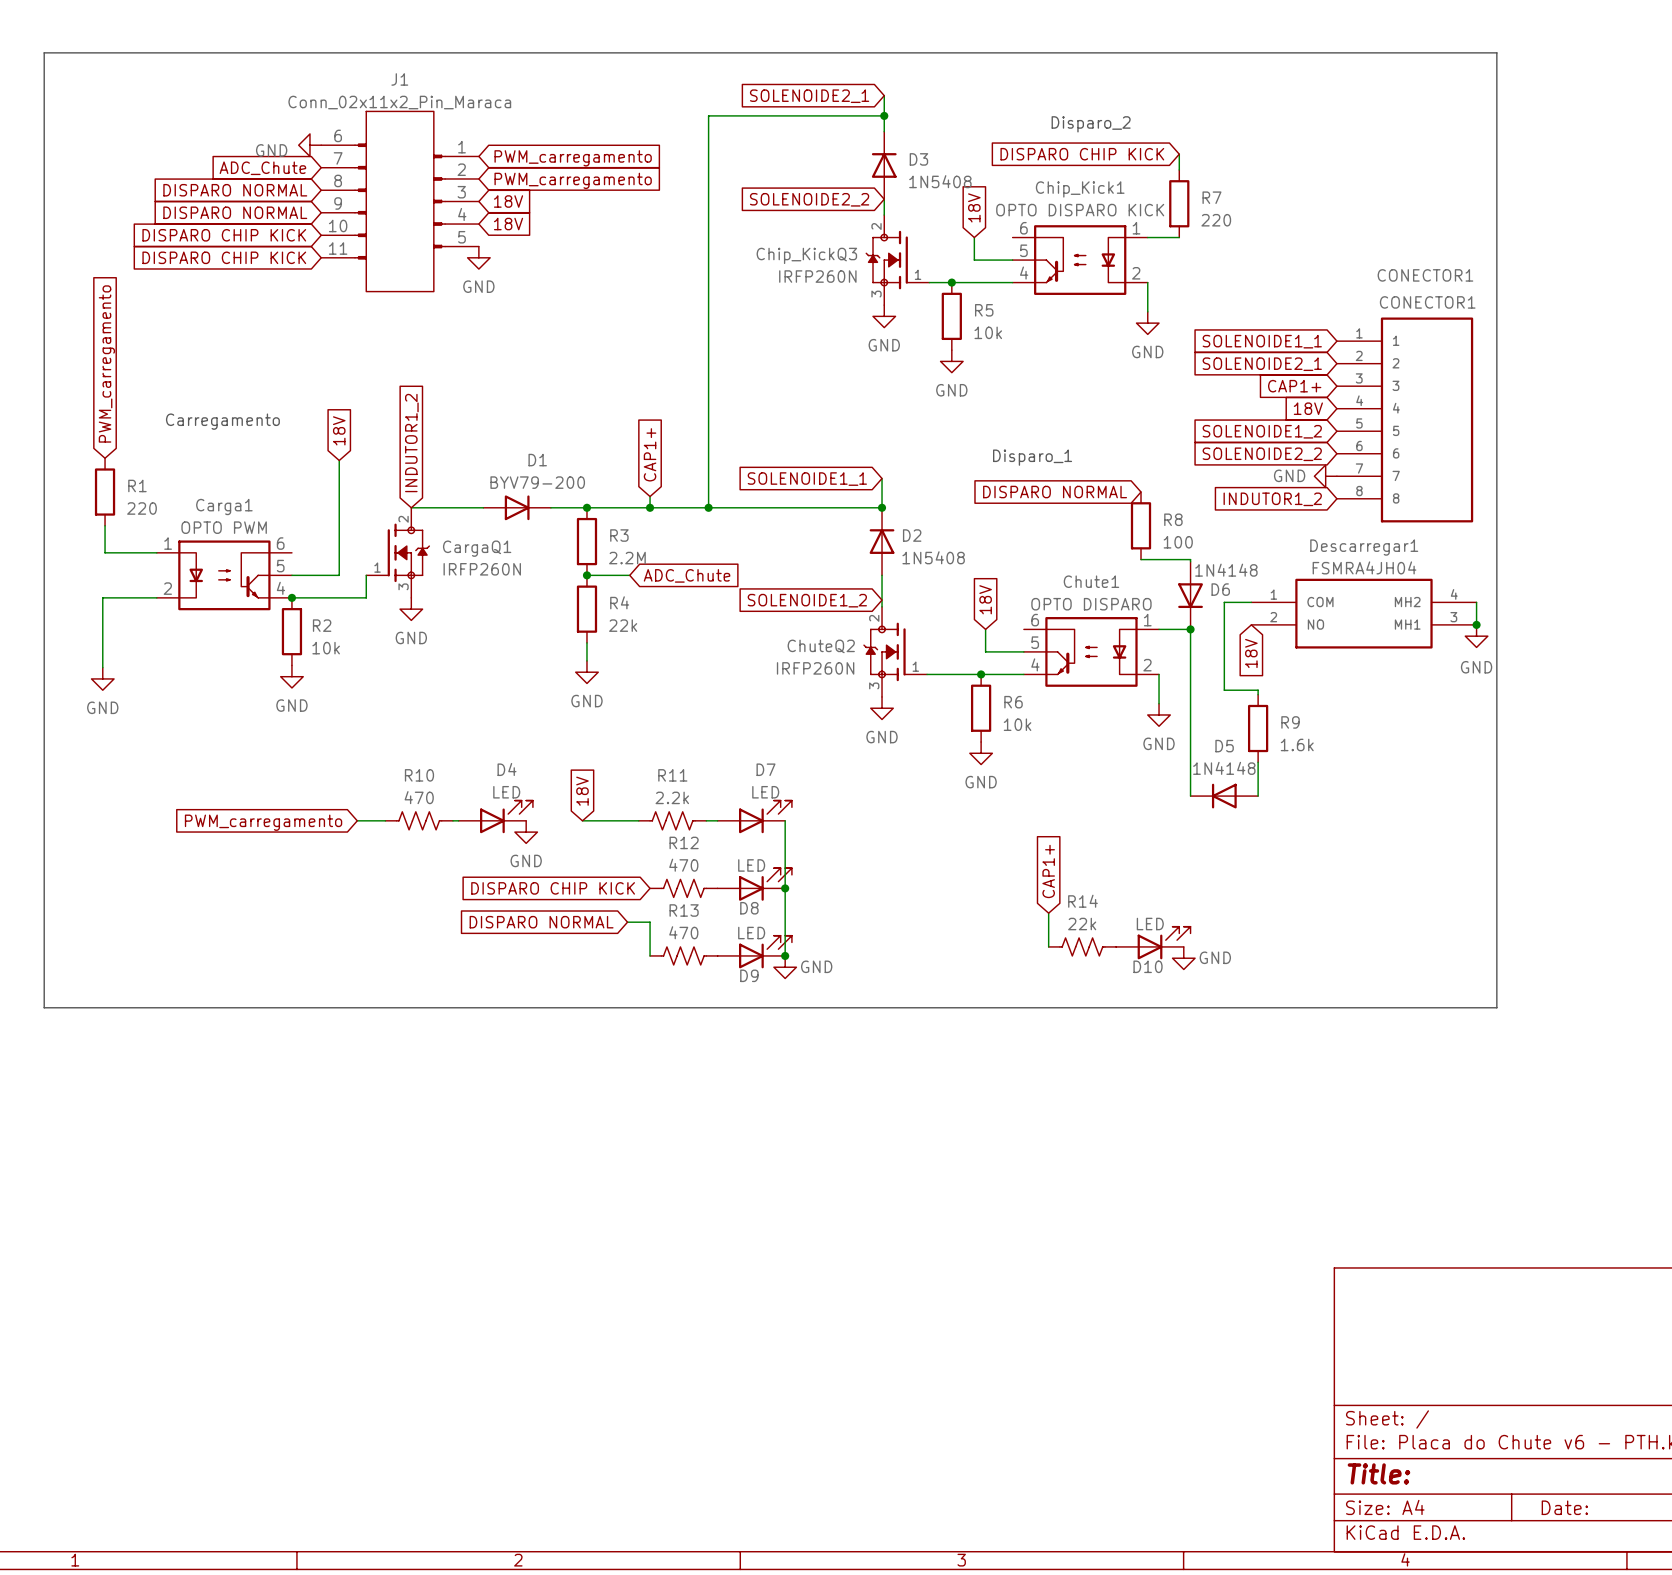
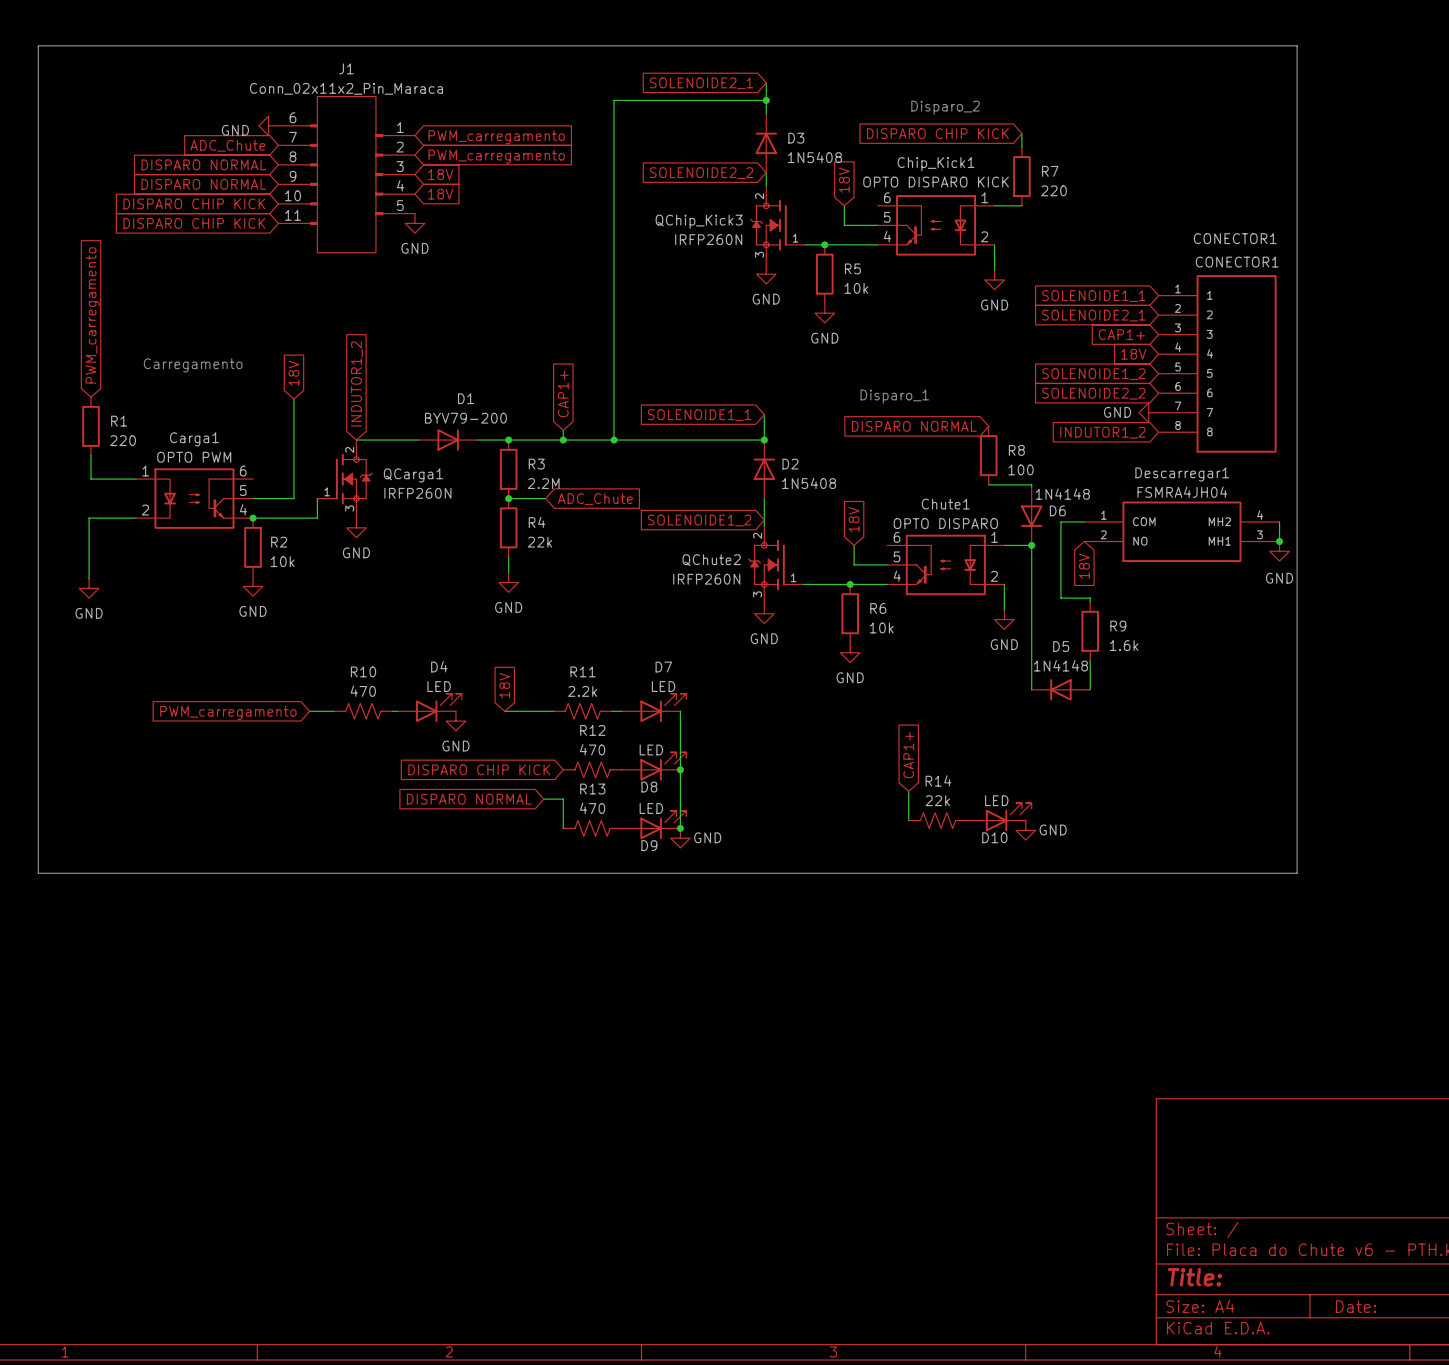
Chip_KickQ3 name: Chip_KickQ3 (806, 255) -> QChip_Kick3 (699, 221)
CargaQ1 name: CargaQ1 (477, 548) -> QCarga1 (413, 475)
ChuteQ2 name: ChuteQ2 (821, 646) -> QChute2 (711, 560)

